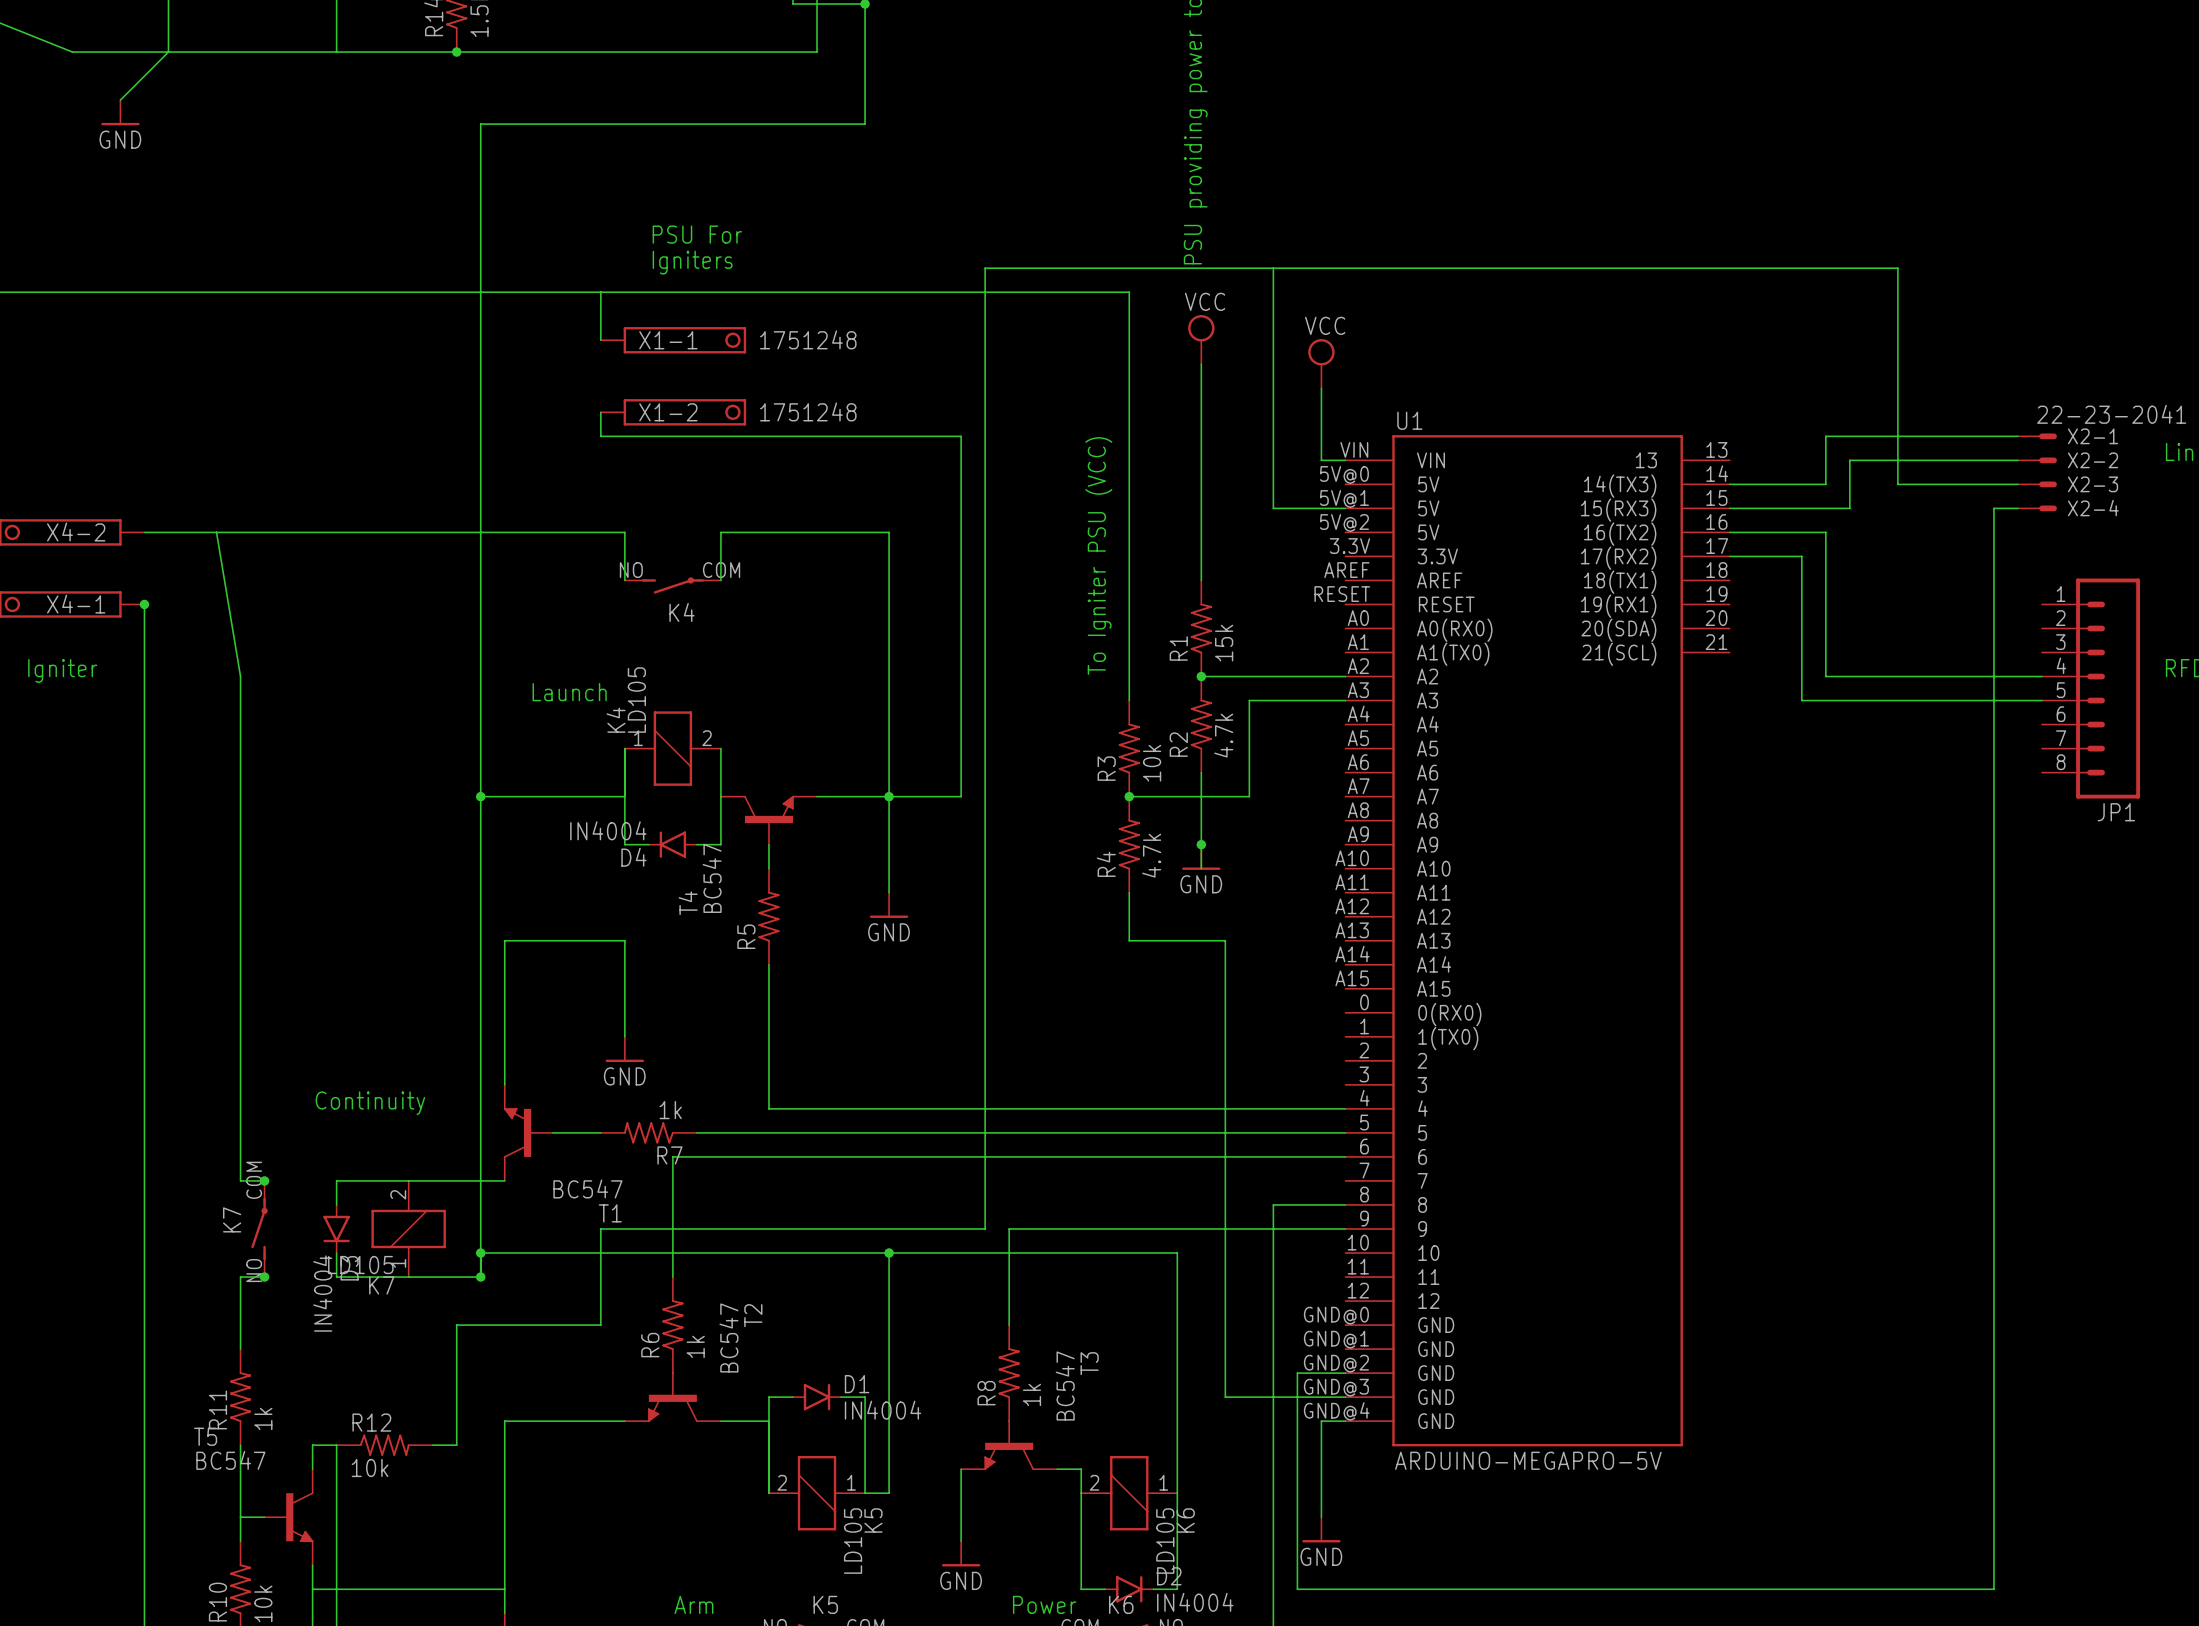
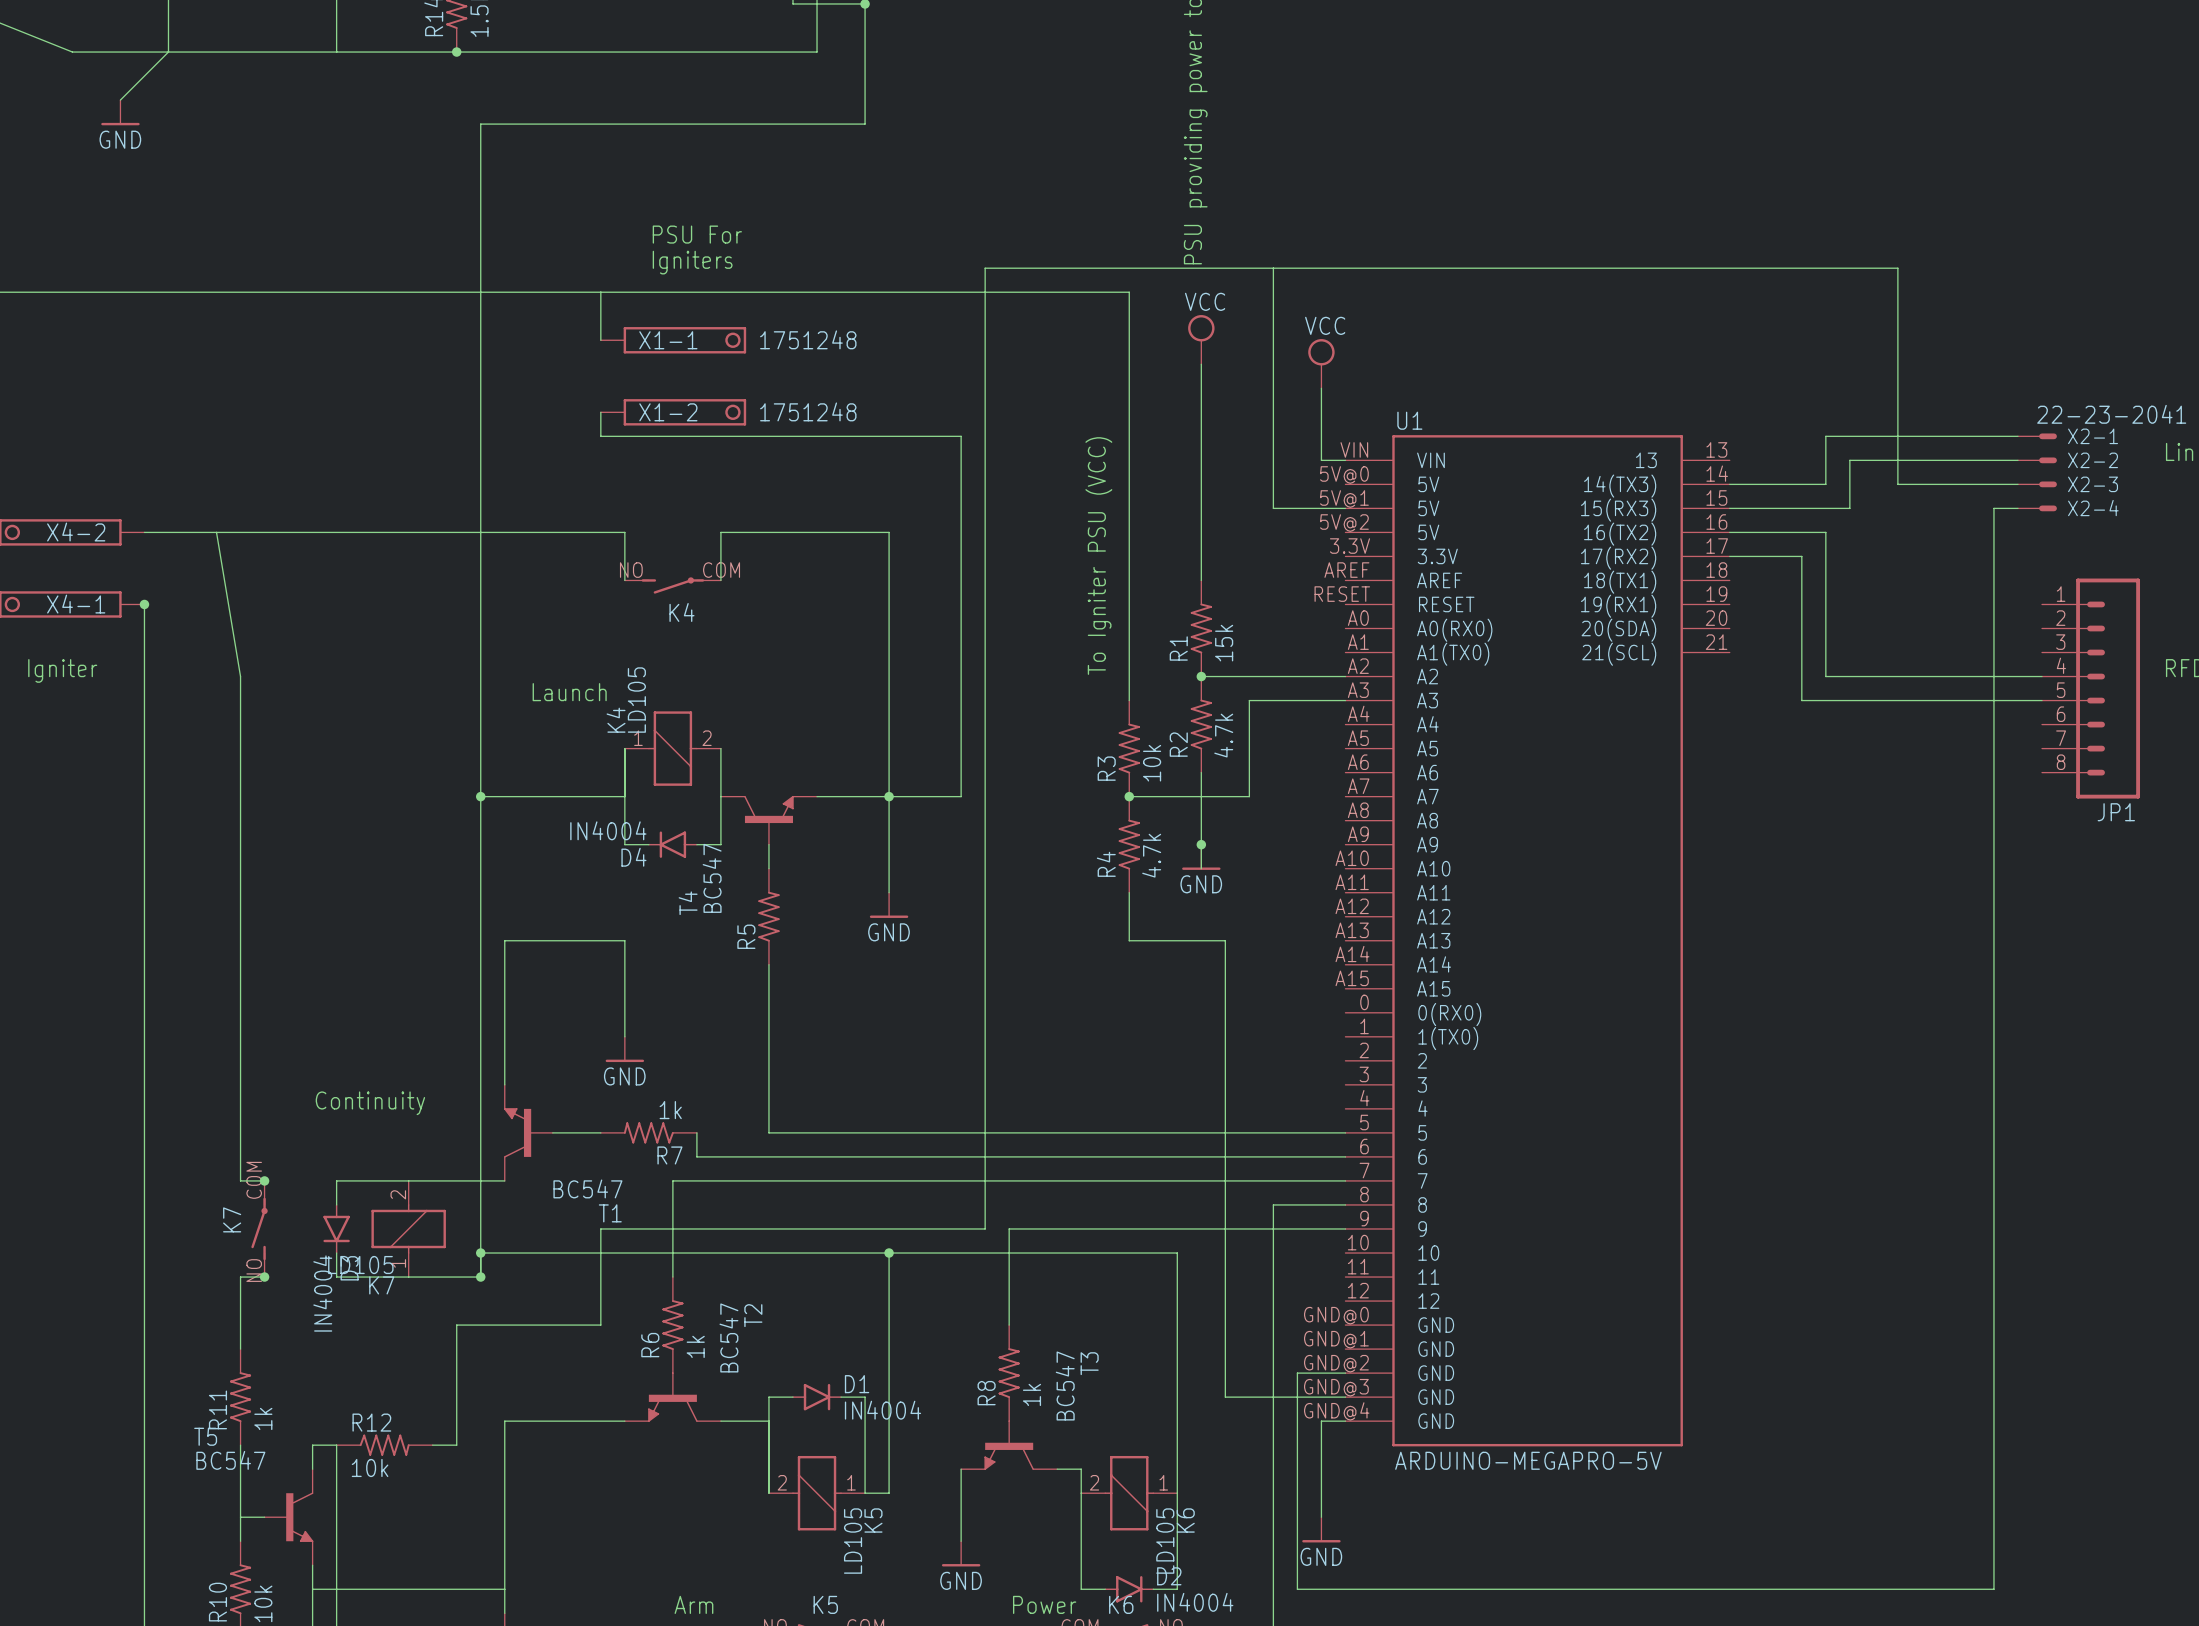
wire: (768, 1108) (1345, 1108) -> none
wire: (696, 1132) (768, 1132) -> (768, 1108) (768, 1132)
wire: (696, 1156) (672, 1156) (672, 1180) -> (696, 1156) (696, 1132)
wire: none -> (672, 1180) (1345, 1180)

